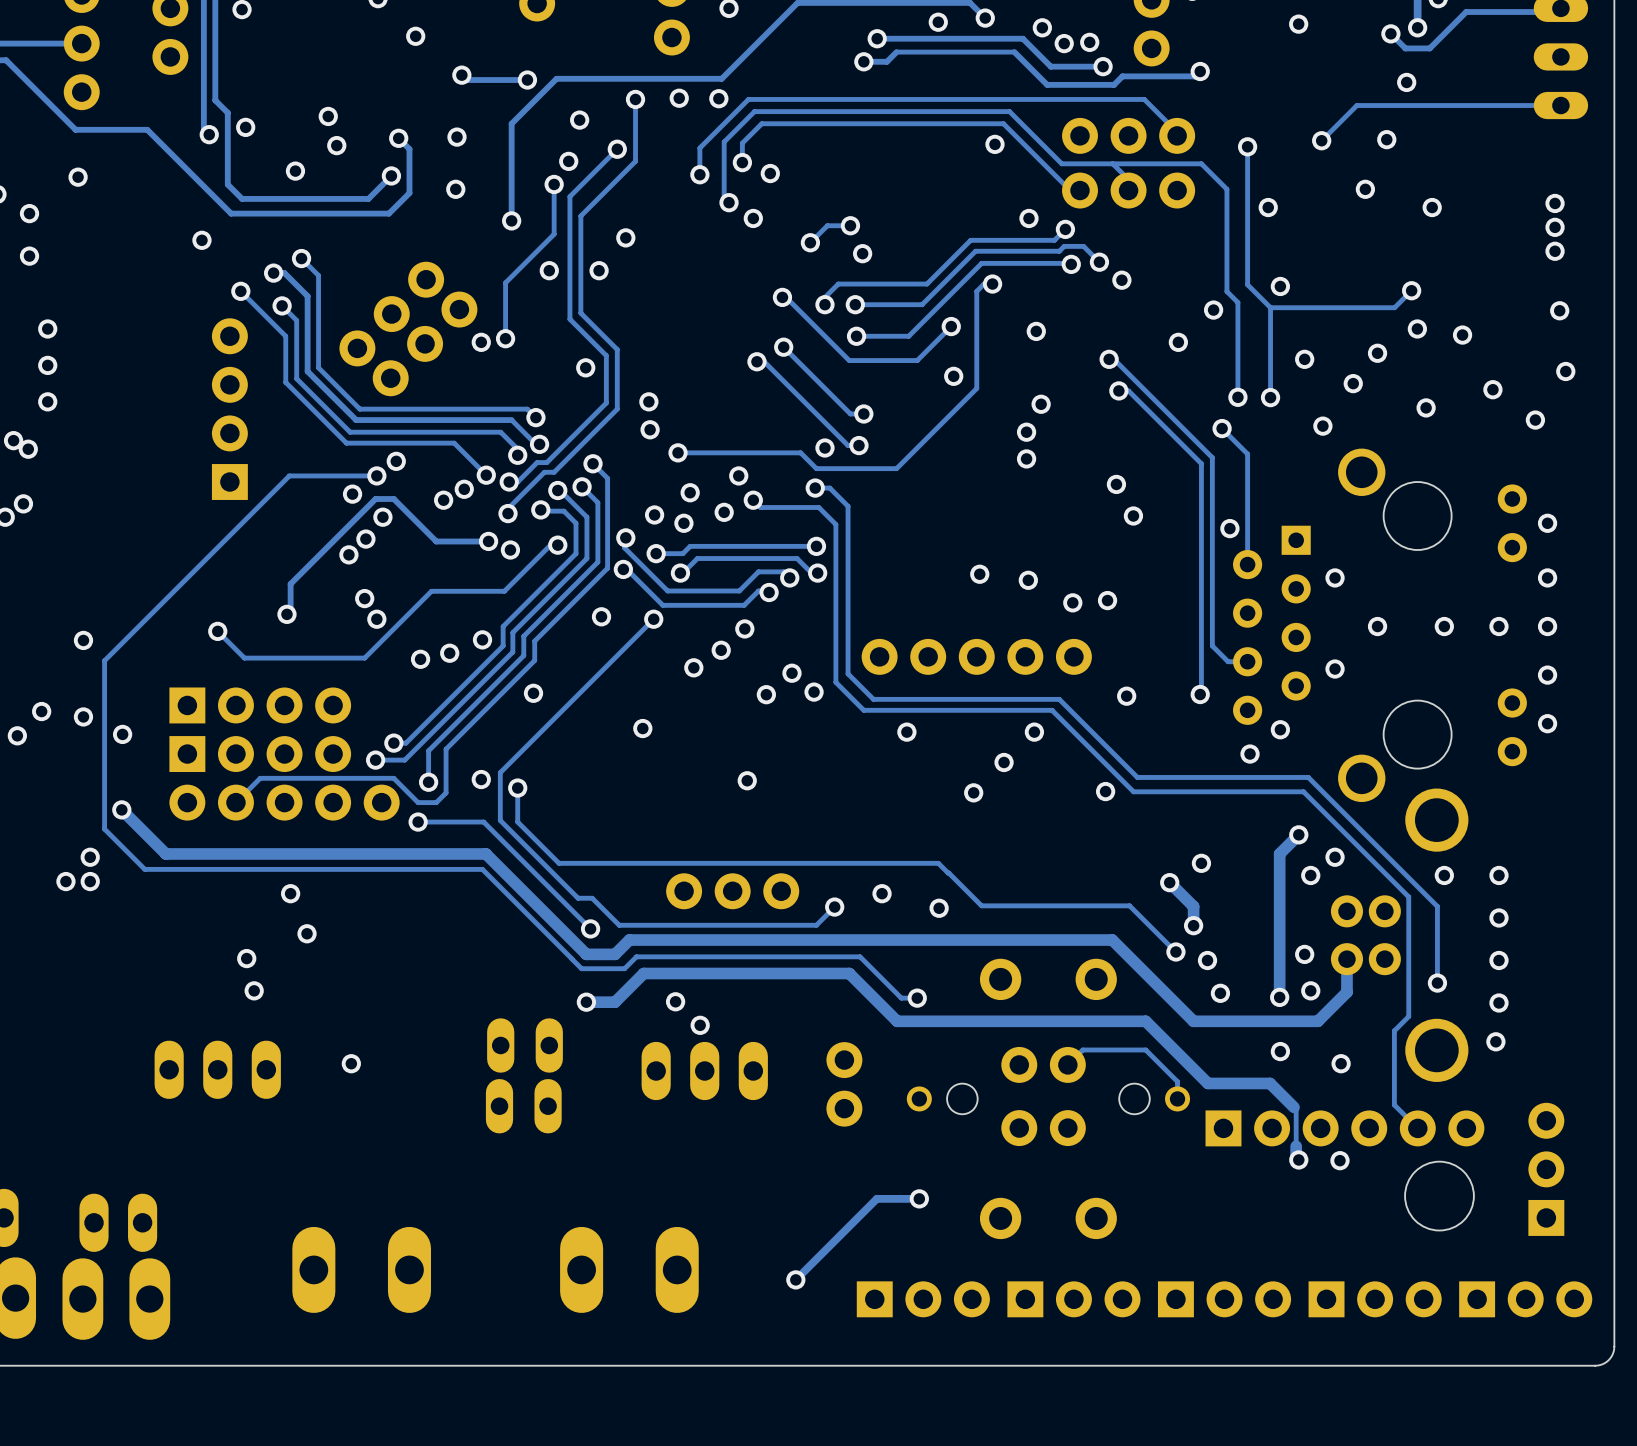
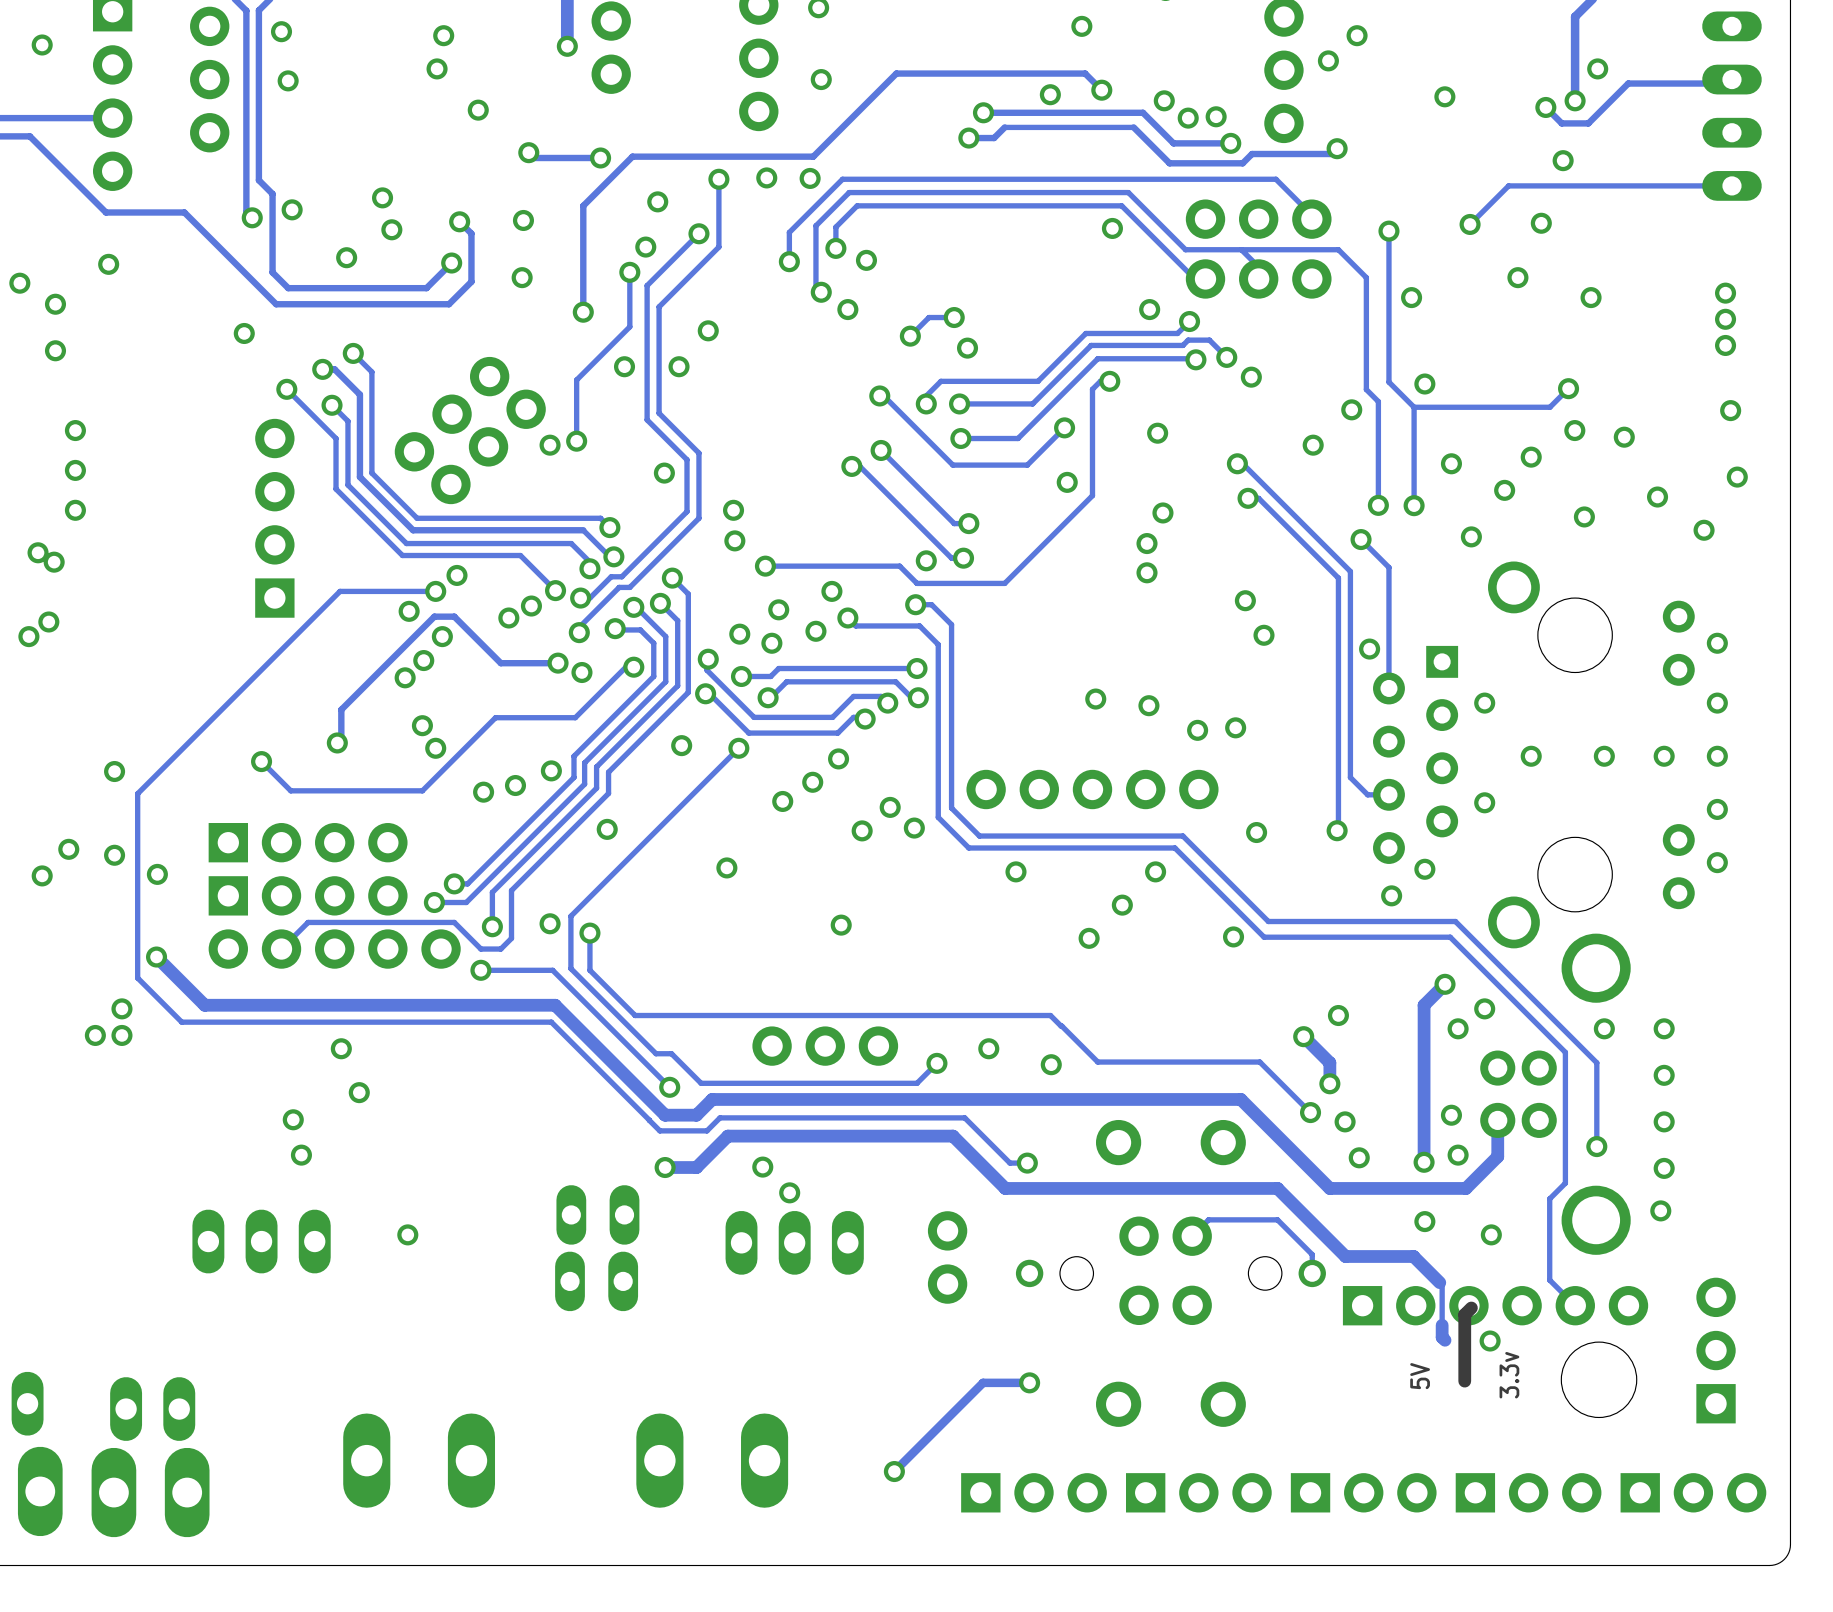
line: none -> (1471, 1308) (1464, 1314) (1464, 1381)
via: (1298, 1159) -> none
text: none -> 5V (1420, 1376)
text: none -> 3.3v (1509, 1375)

